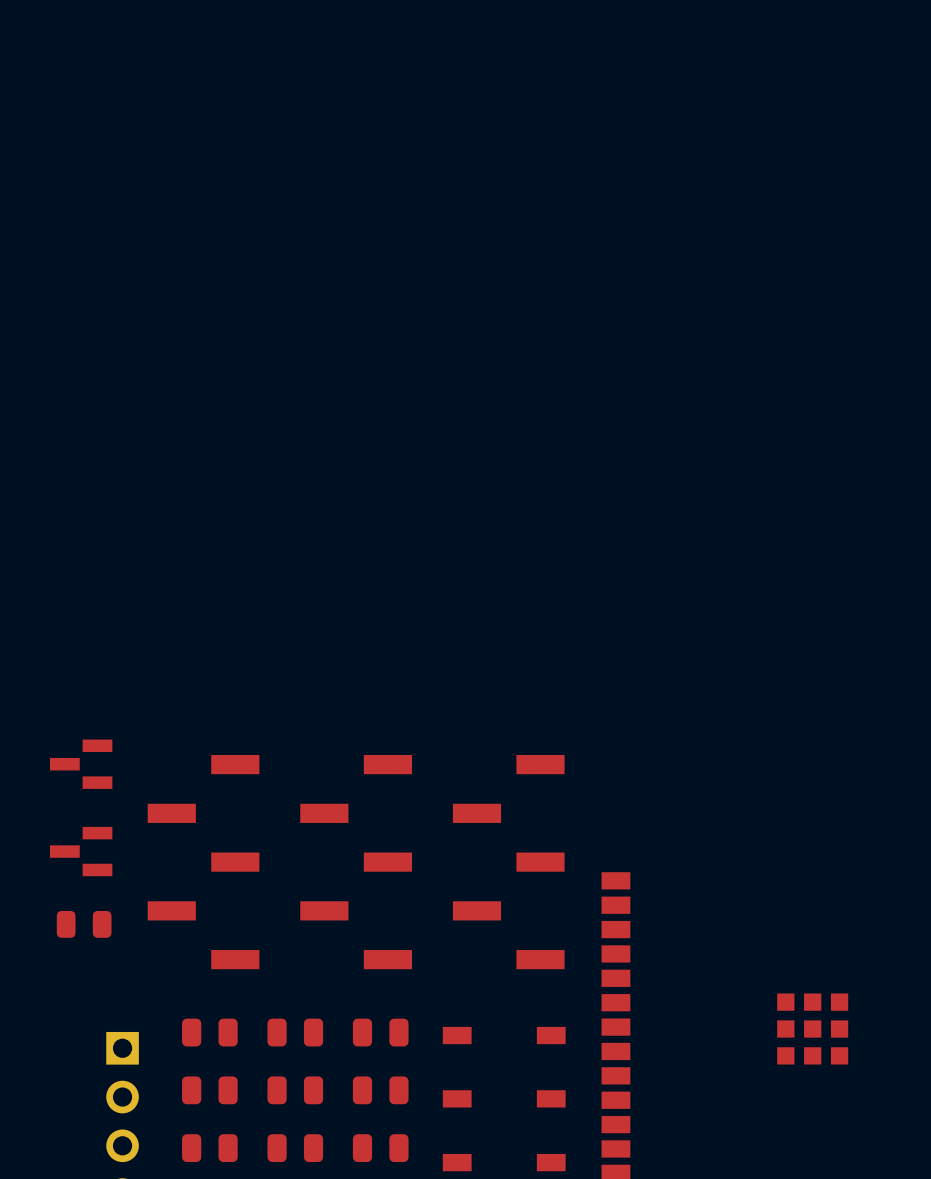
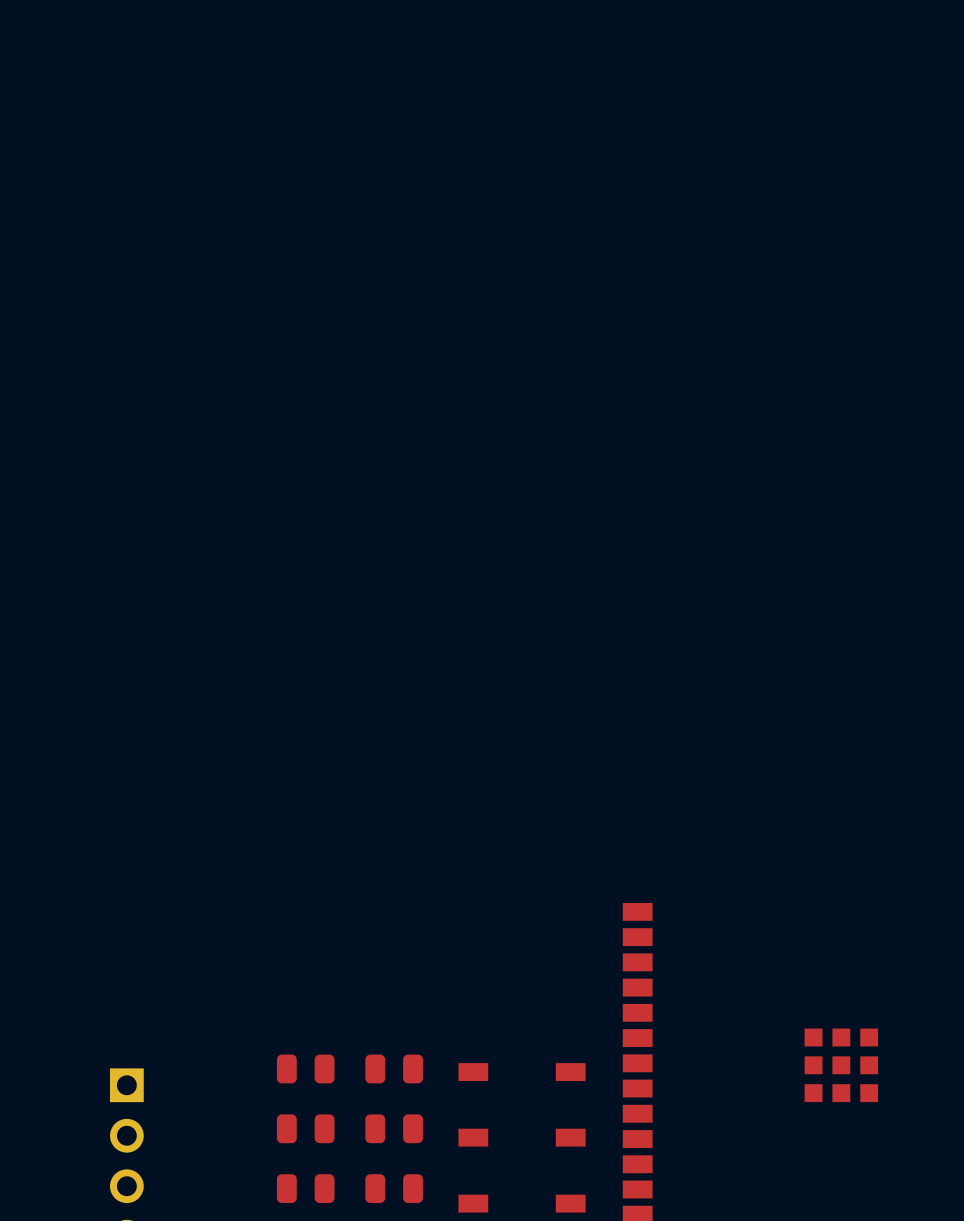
part: (81, 764) -> none
part: (81, 851) -> none
part: (203, 862) -> none
part: (356, 862) -> none
part: (508, 862) -> none
part: (84, 924) -> none
part: (209, 1032) -> none
part: (209, 1090) -> none
part: (209, 1148) -> none

